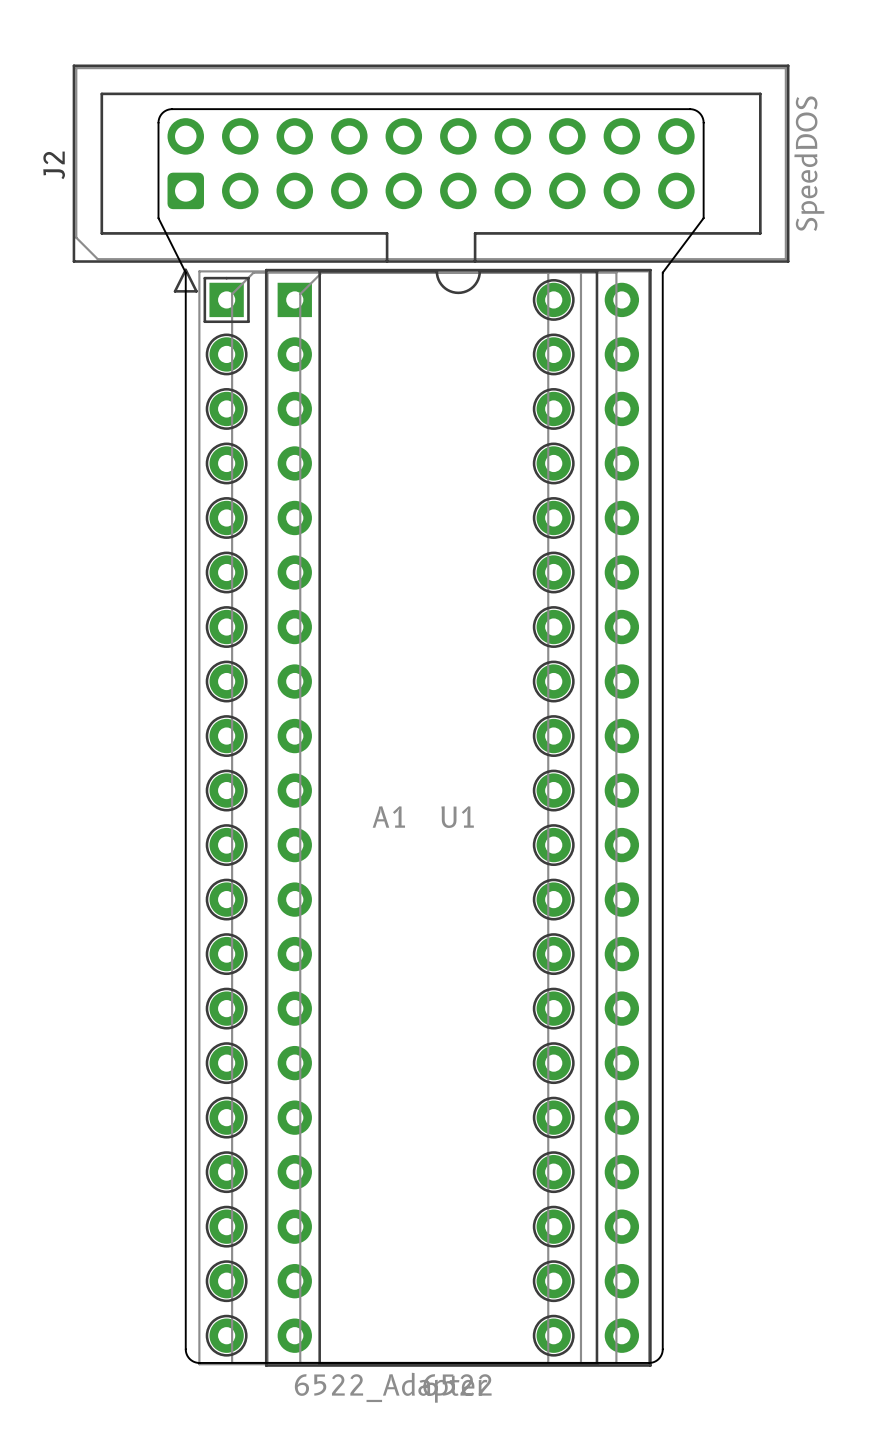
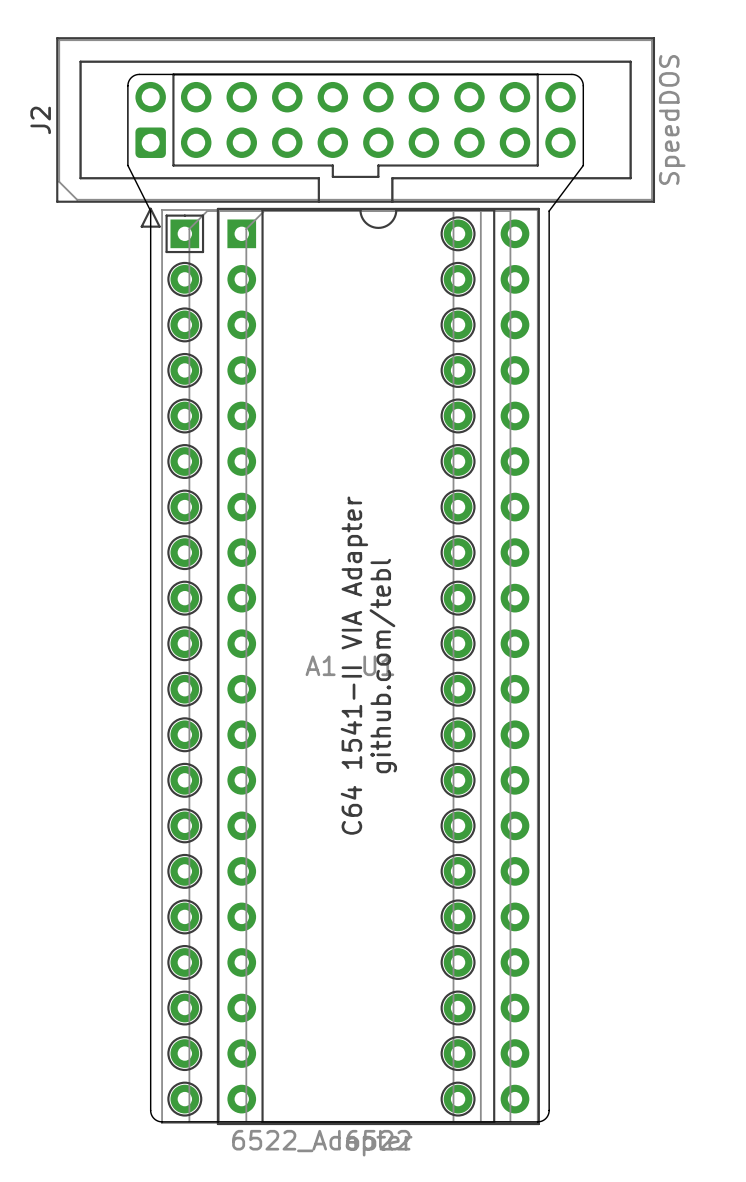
J2 footprint: [72, 64, 790, 293] -> [56, 37, 656, 228]
text: none -> C64 1541-II VIA Adapter (354, 665)
text: none -> github.com/tebl (383, 666)

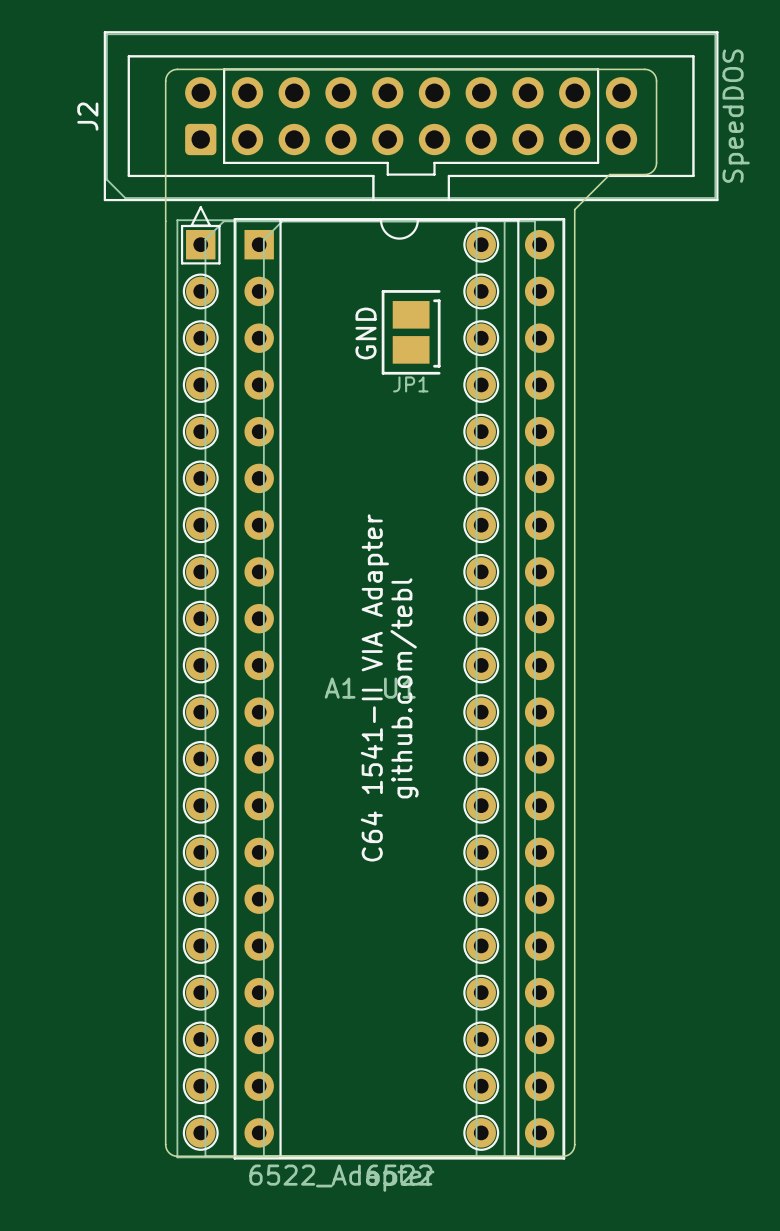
J2 position: (355, 132) -> (411, 128)
board edge: (150, 211) (127, 165) (127, 84) (131, 77) (136, 74) (573, 74) (579, 77) (583, 84) (583, 165) (549, 211) -> (165, 221) (165, 81) (168, 73) (174, 69) (644, 69) (650, 70) (654, 75) (656, 81) (654, 168) (646, 174) (609, 174) (574, 209) (574, 221)
JP1: none -> GND (411, 332)

